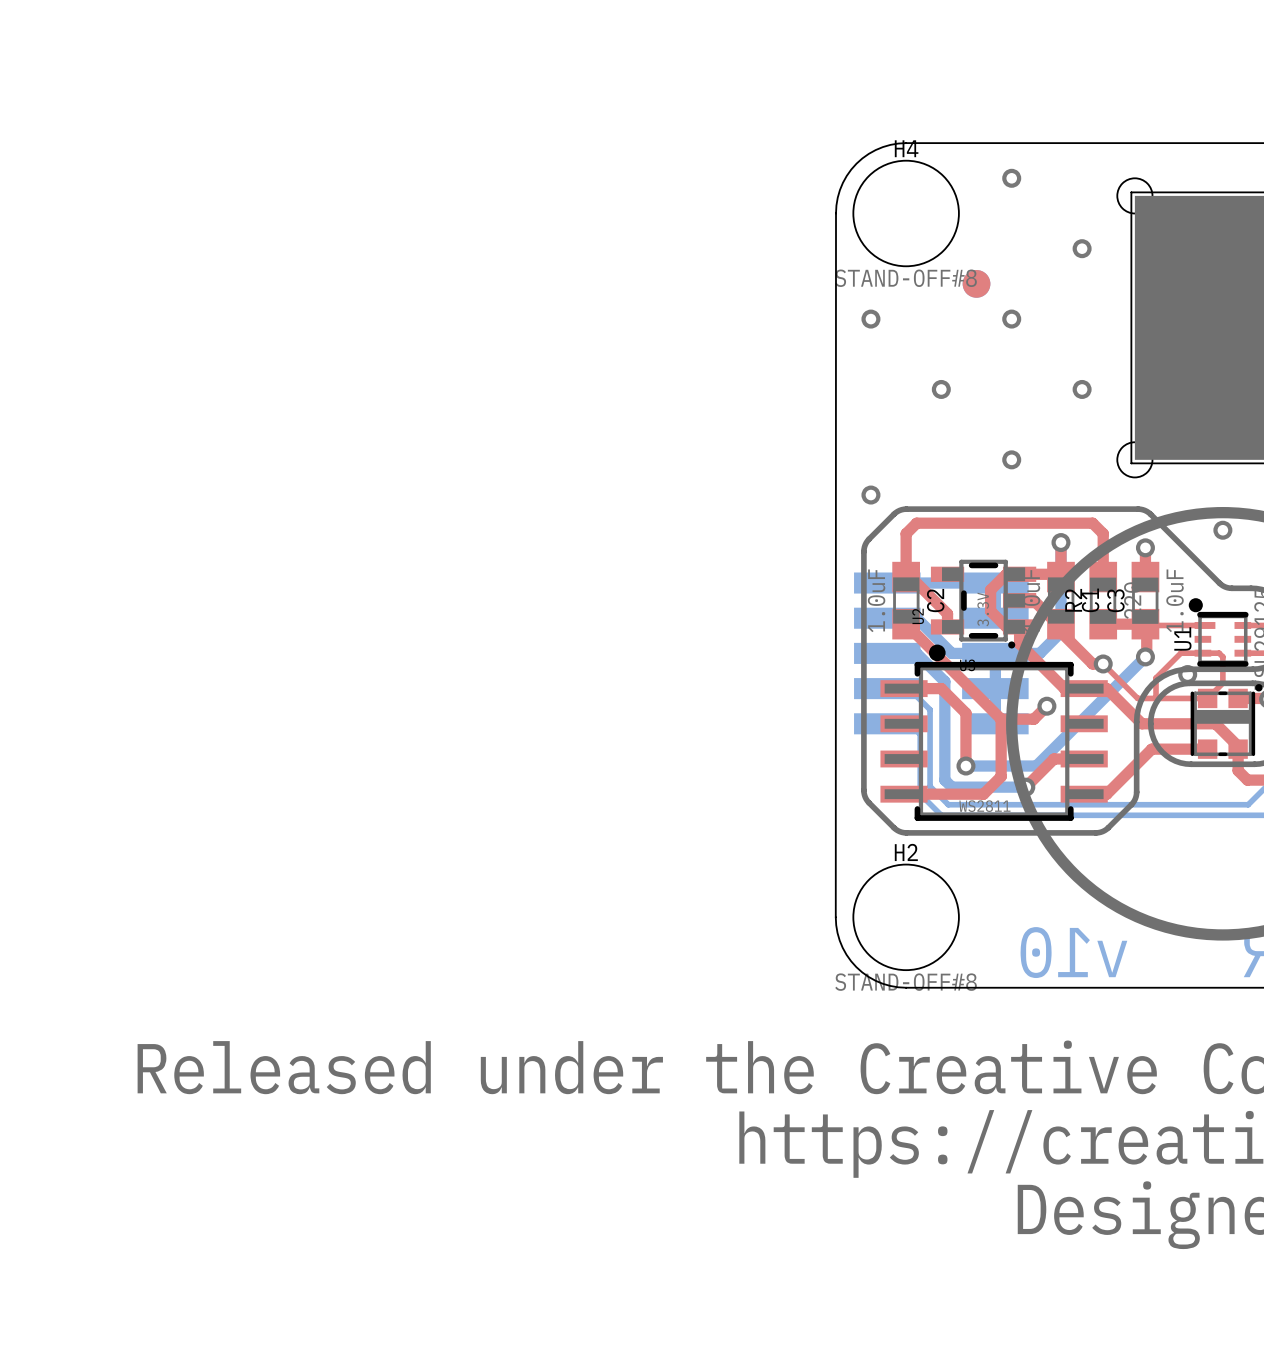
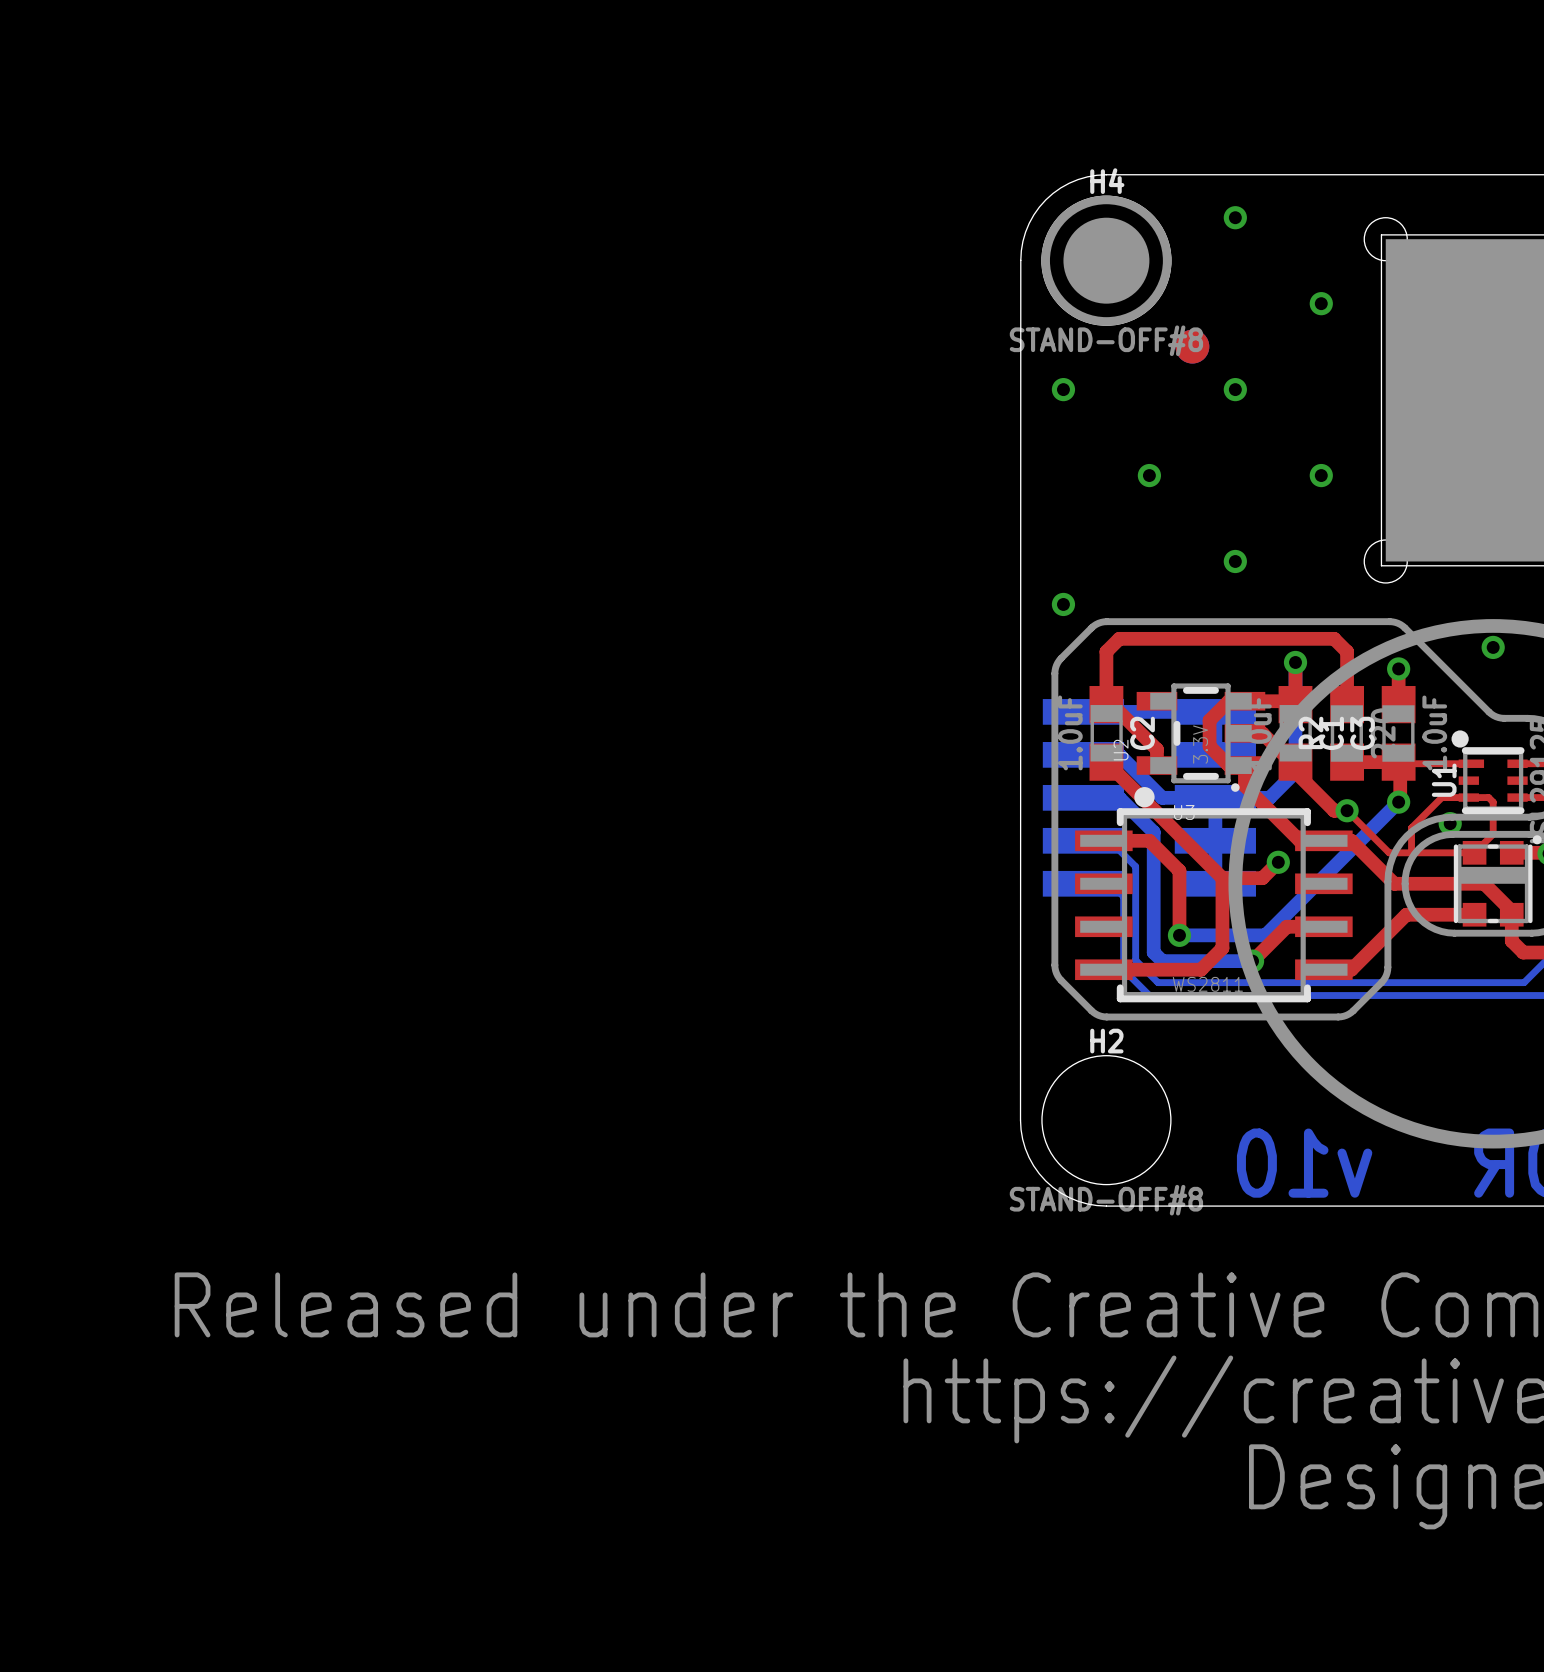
drawing: none -> [1041, 195, 1172, 326]

